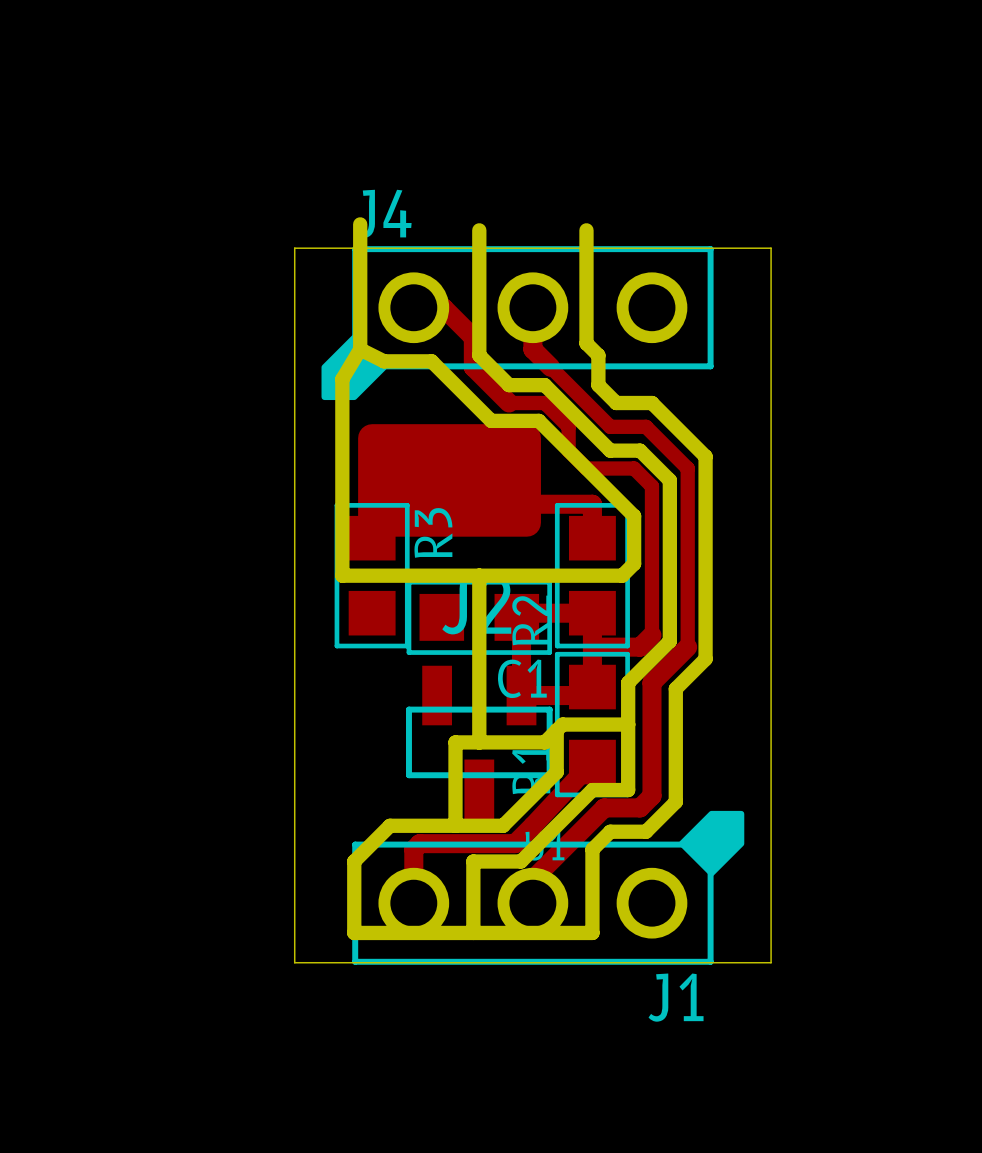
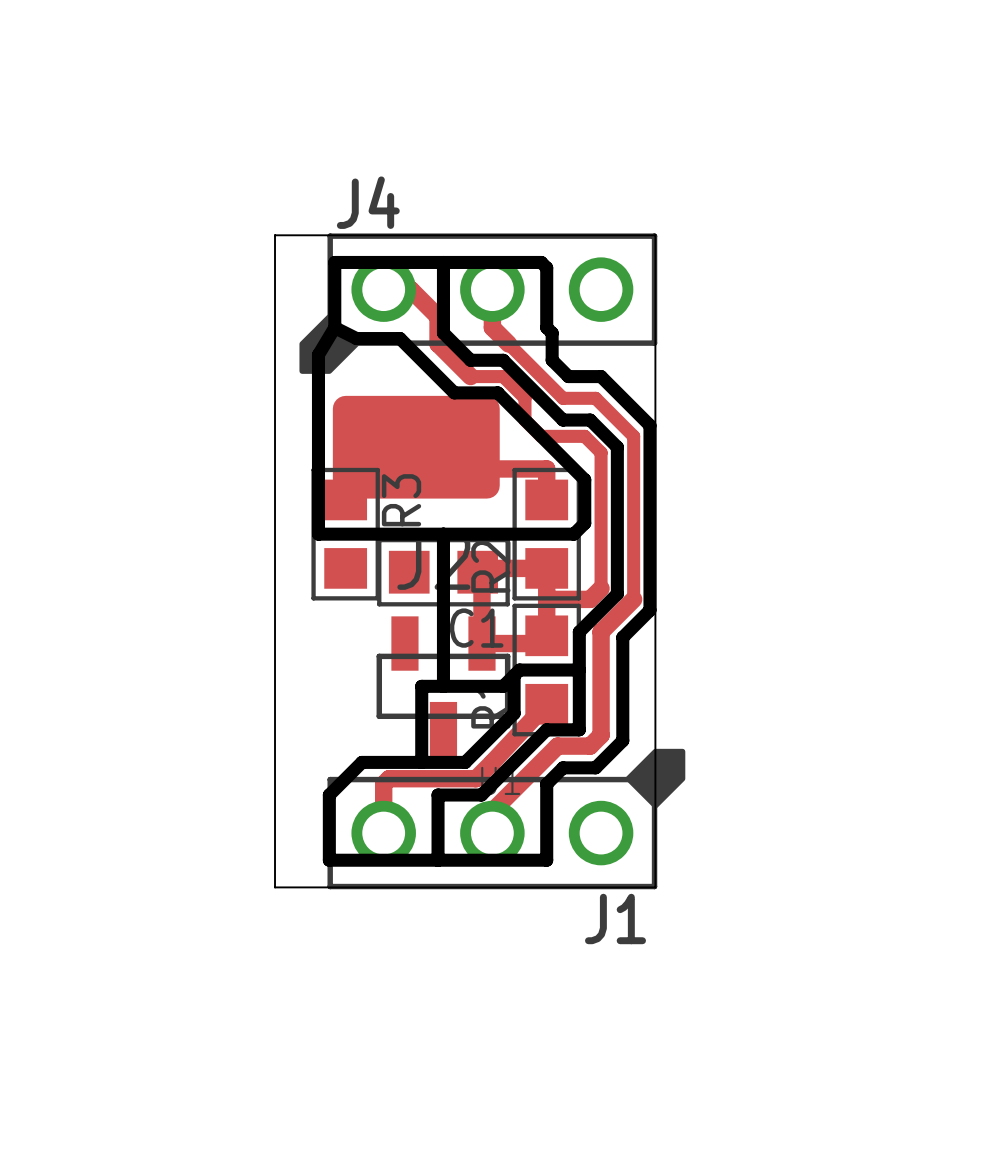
board edge: (360, 224) (360, 277) -> none
board edge: (479, 230) (479, 277) -> none
board edge: (586, 230) (586, 343) (592, 349) -> (334, 262) (541, 262) (546, 267) (546, 327)
board edge: (711, 248) (771, 248) (771, 962) (711, 962) -> (655, 235) (655, 887)

